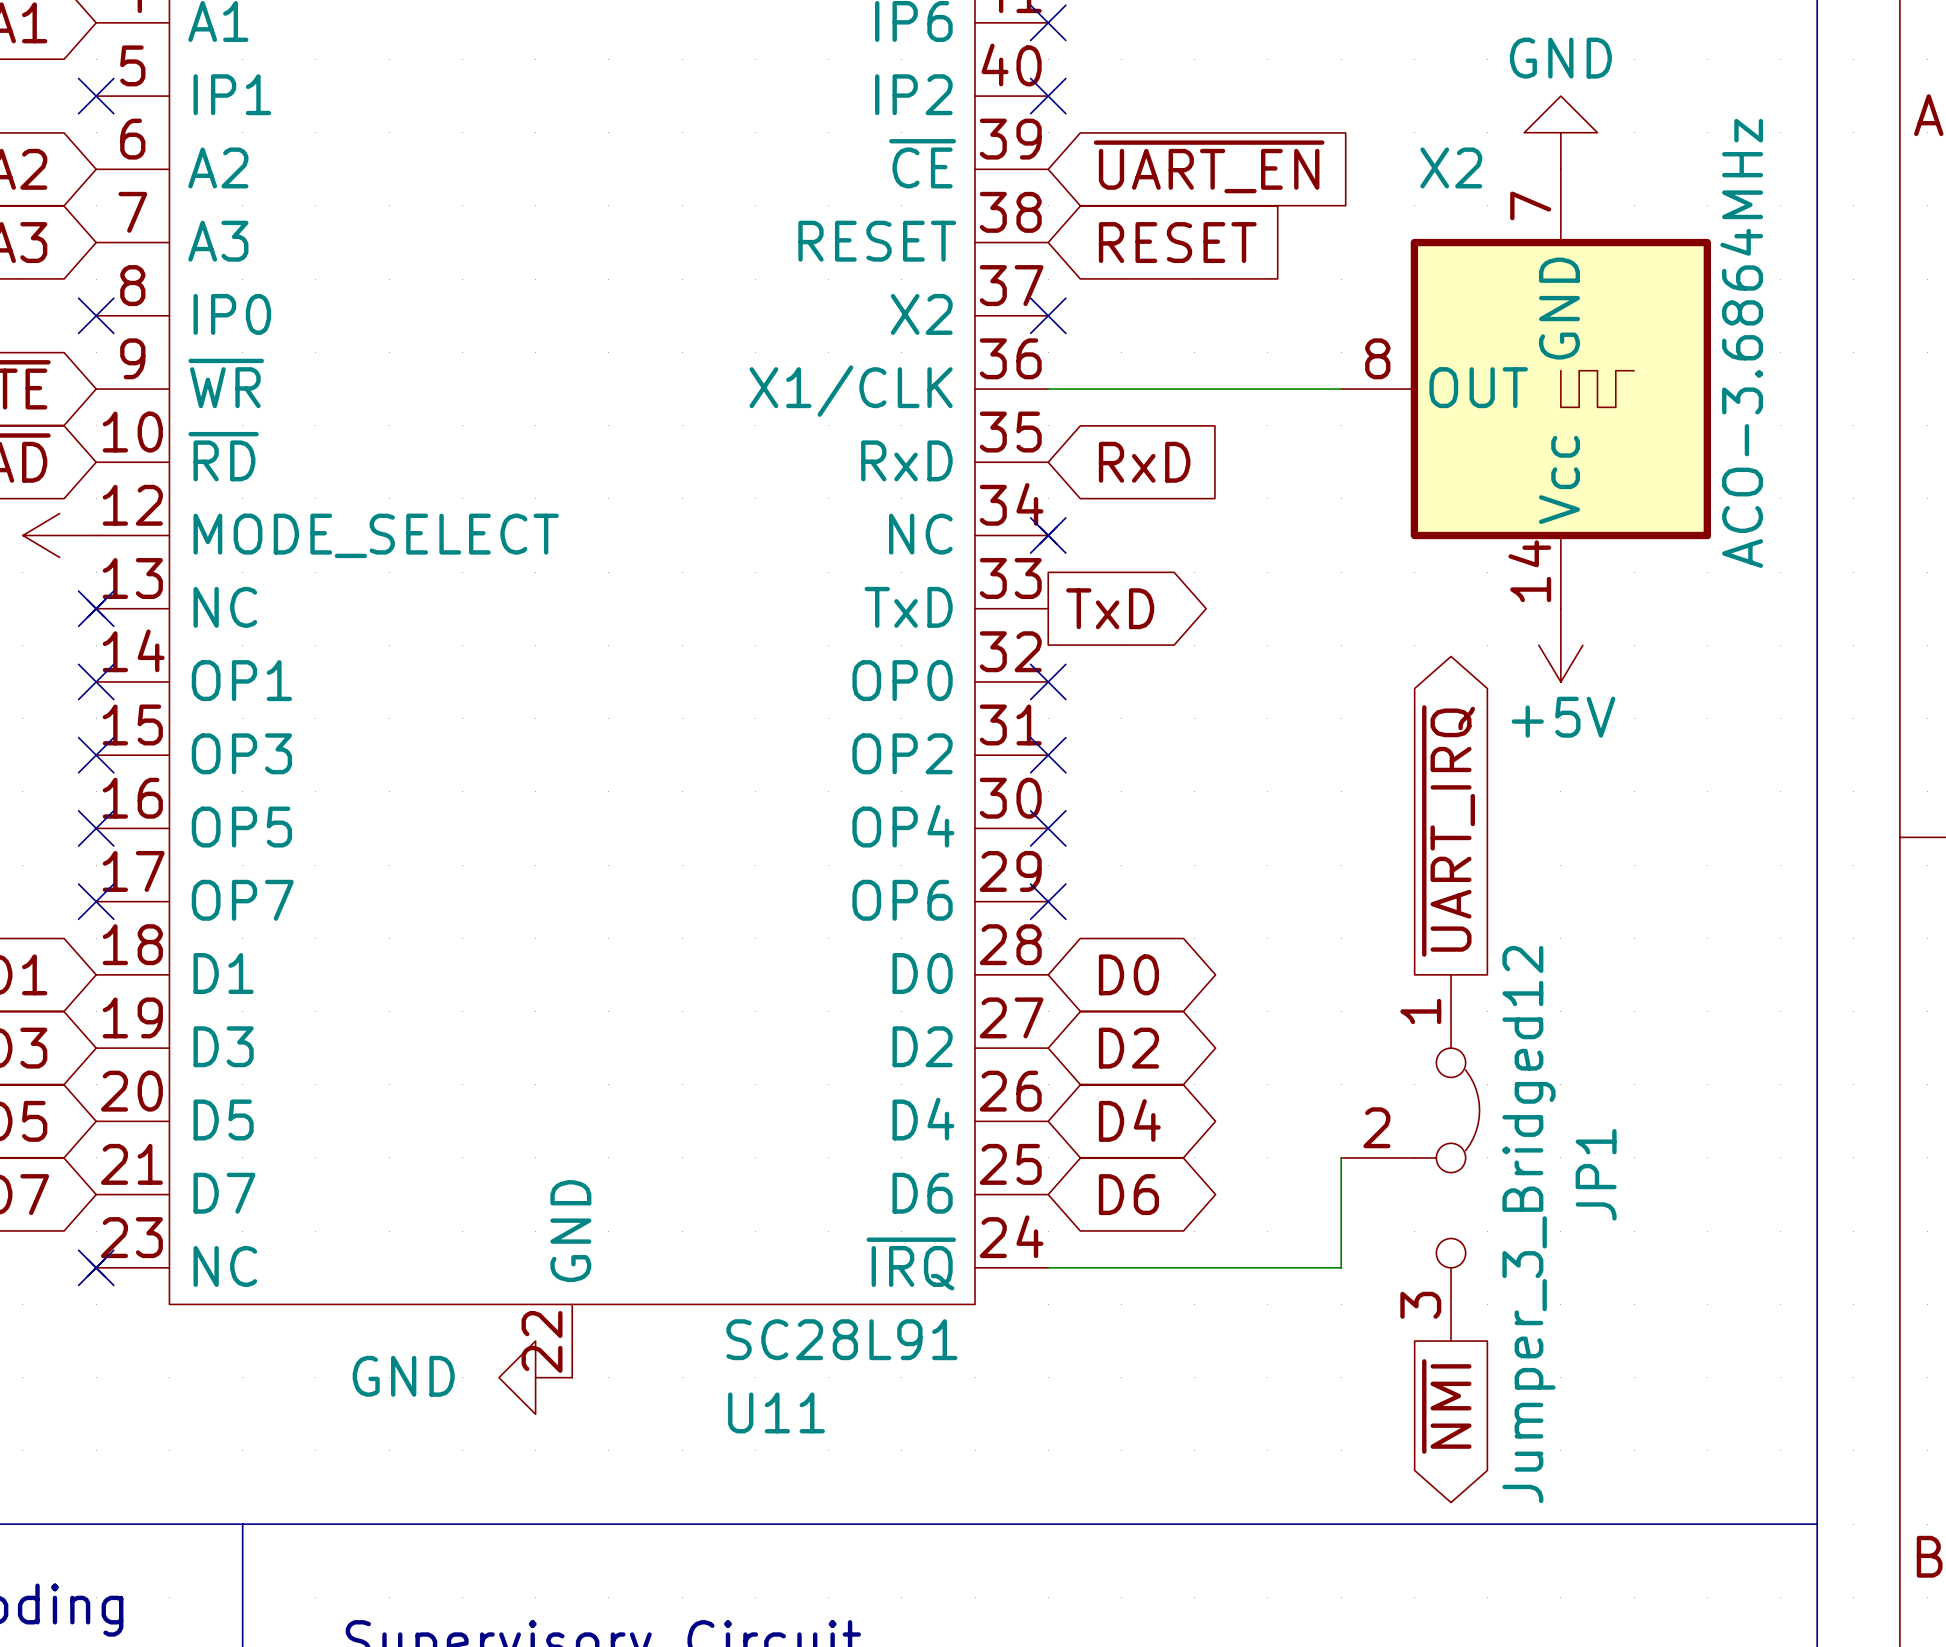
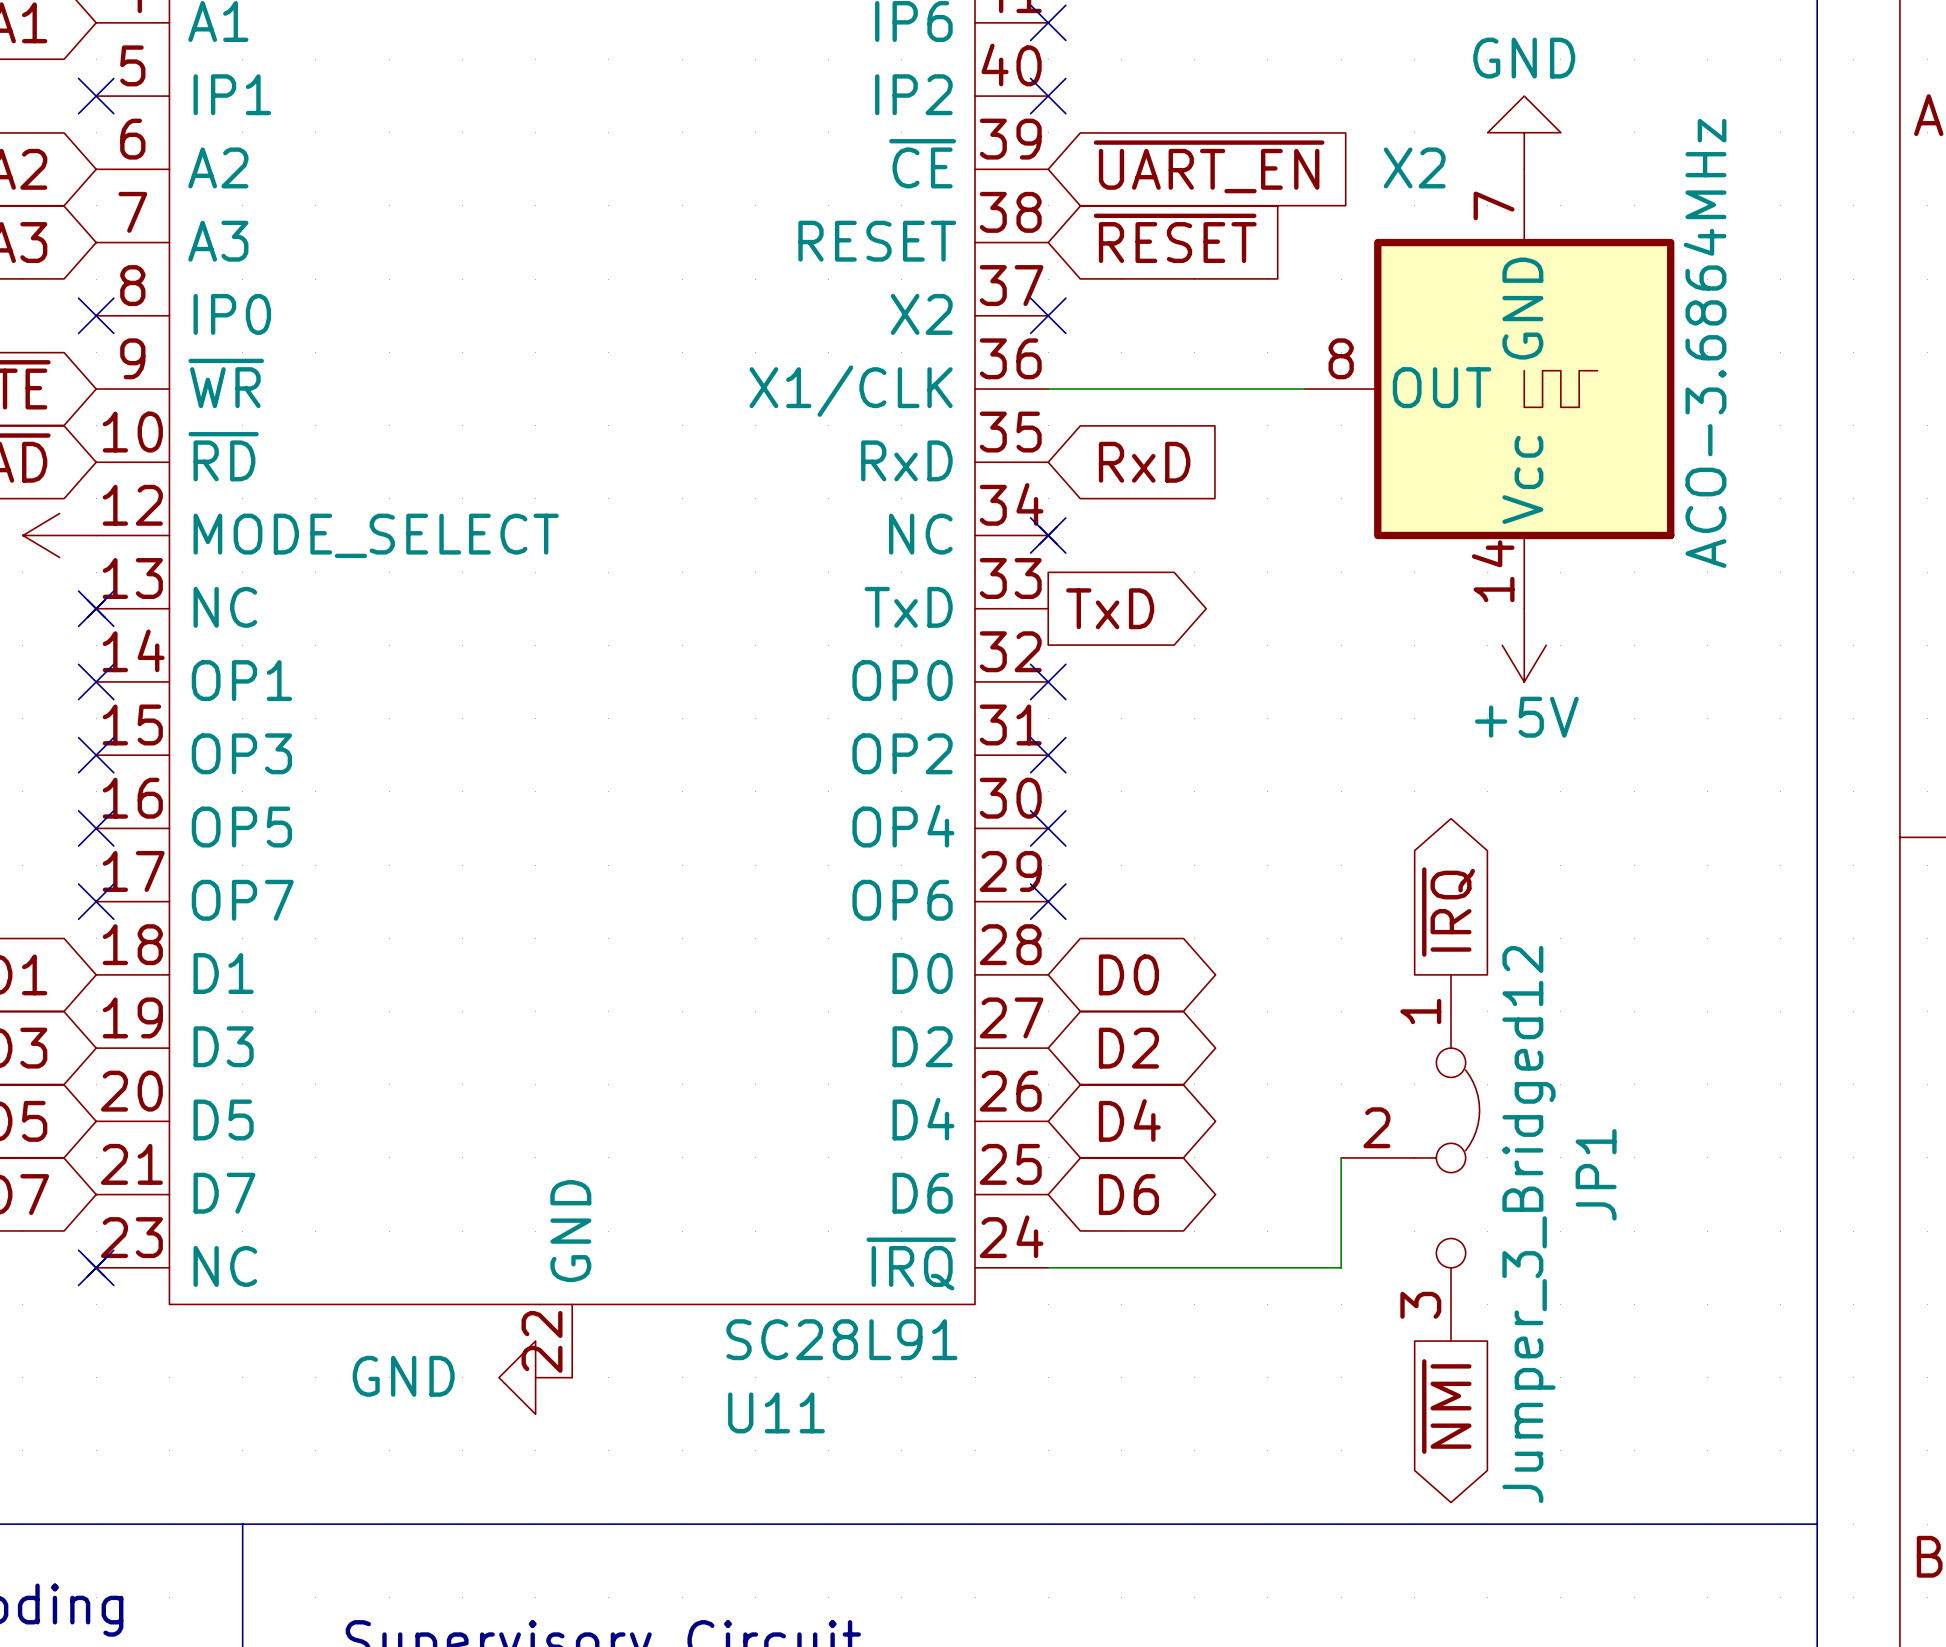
power symbol position: GND (1560, 132) -> GND (1524, 132)
global label: RESET (1177, 242) -> ~{RESET} (1175, 238)
X2 position: (1526, 389) -> (1489, 389)
power symbol position: +5V (1560, 645) -> +5V (1524, 645)
global label: ~{UART_IRQ} (1448, 830) -> ~{IRQ} (1448, 912)

